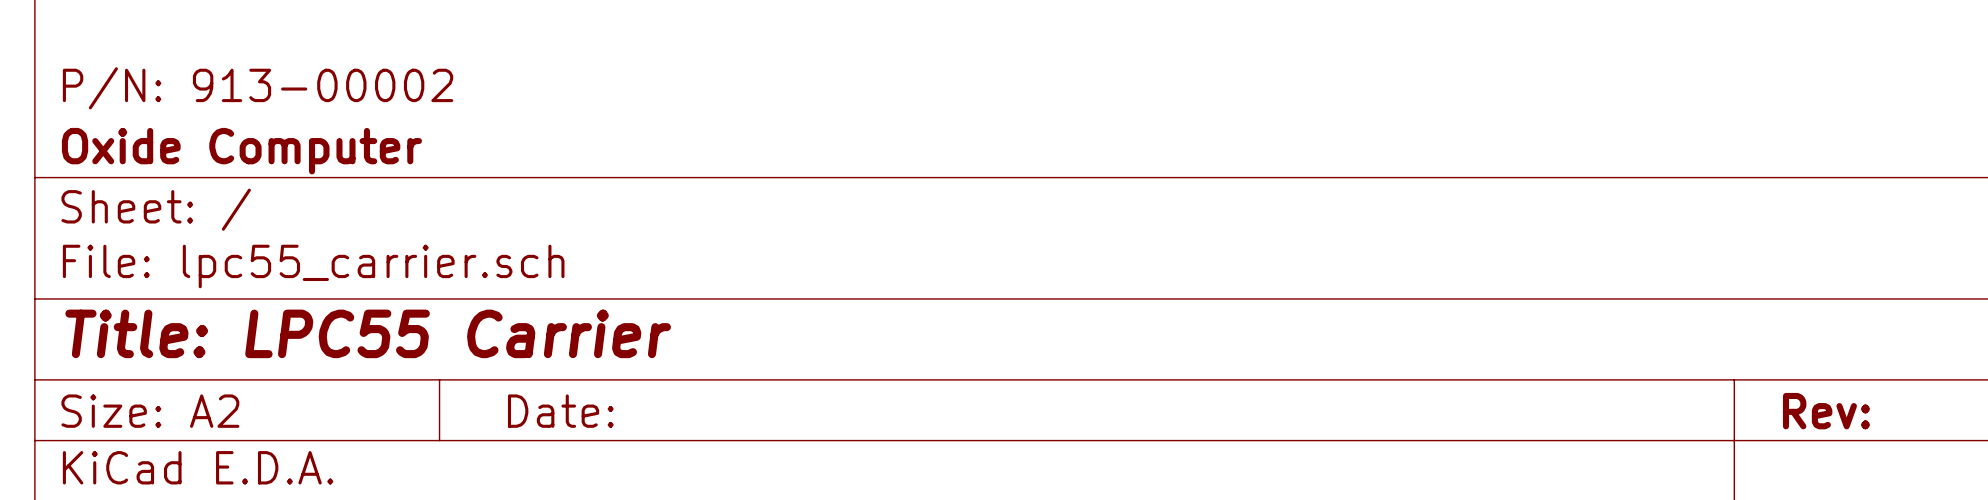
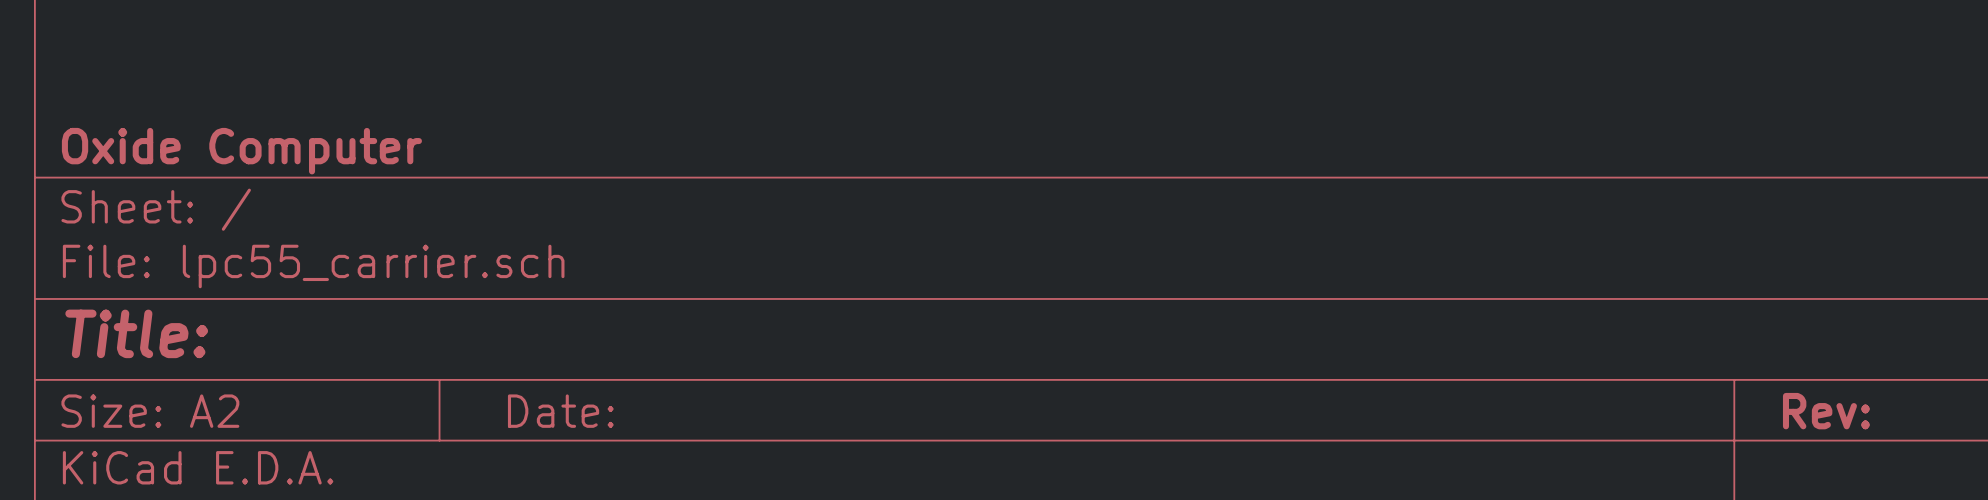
title block: P/N: 913-00002 (258, 88) -> none
title block: Title: LPC55 Carrier (368, 333) -> Title: (136, 333)

